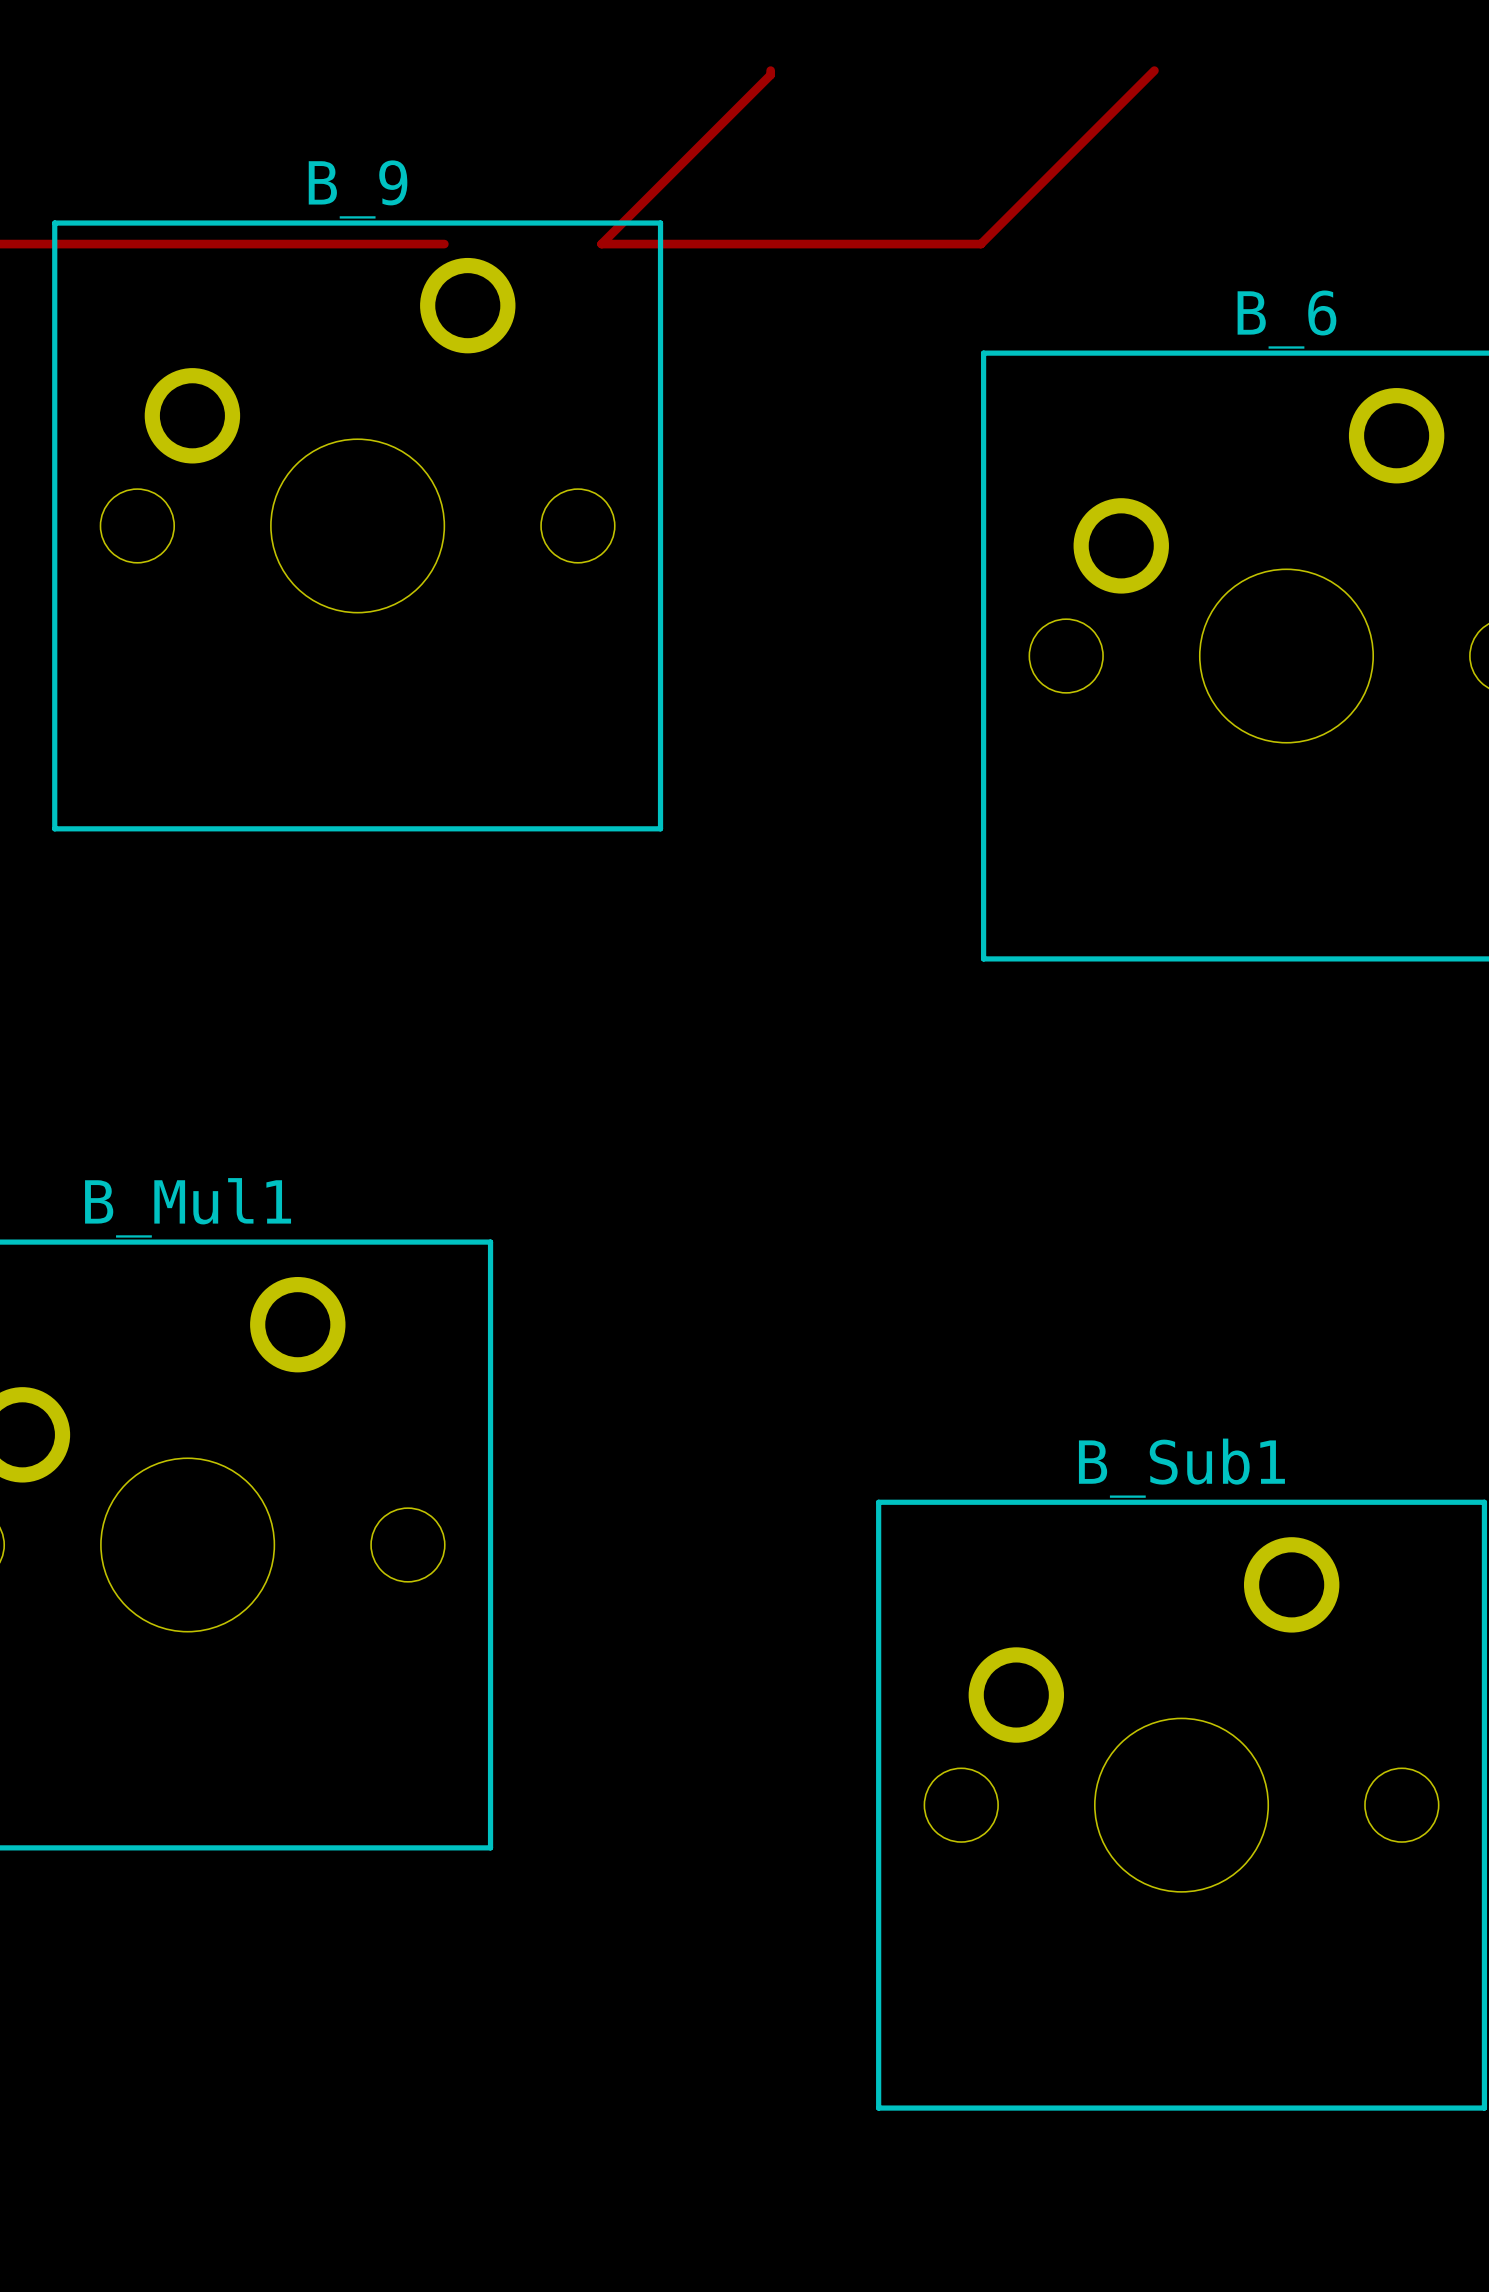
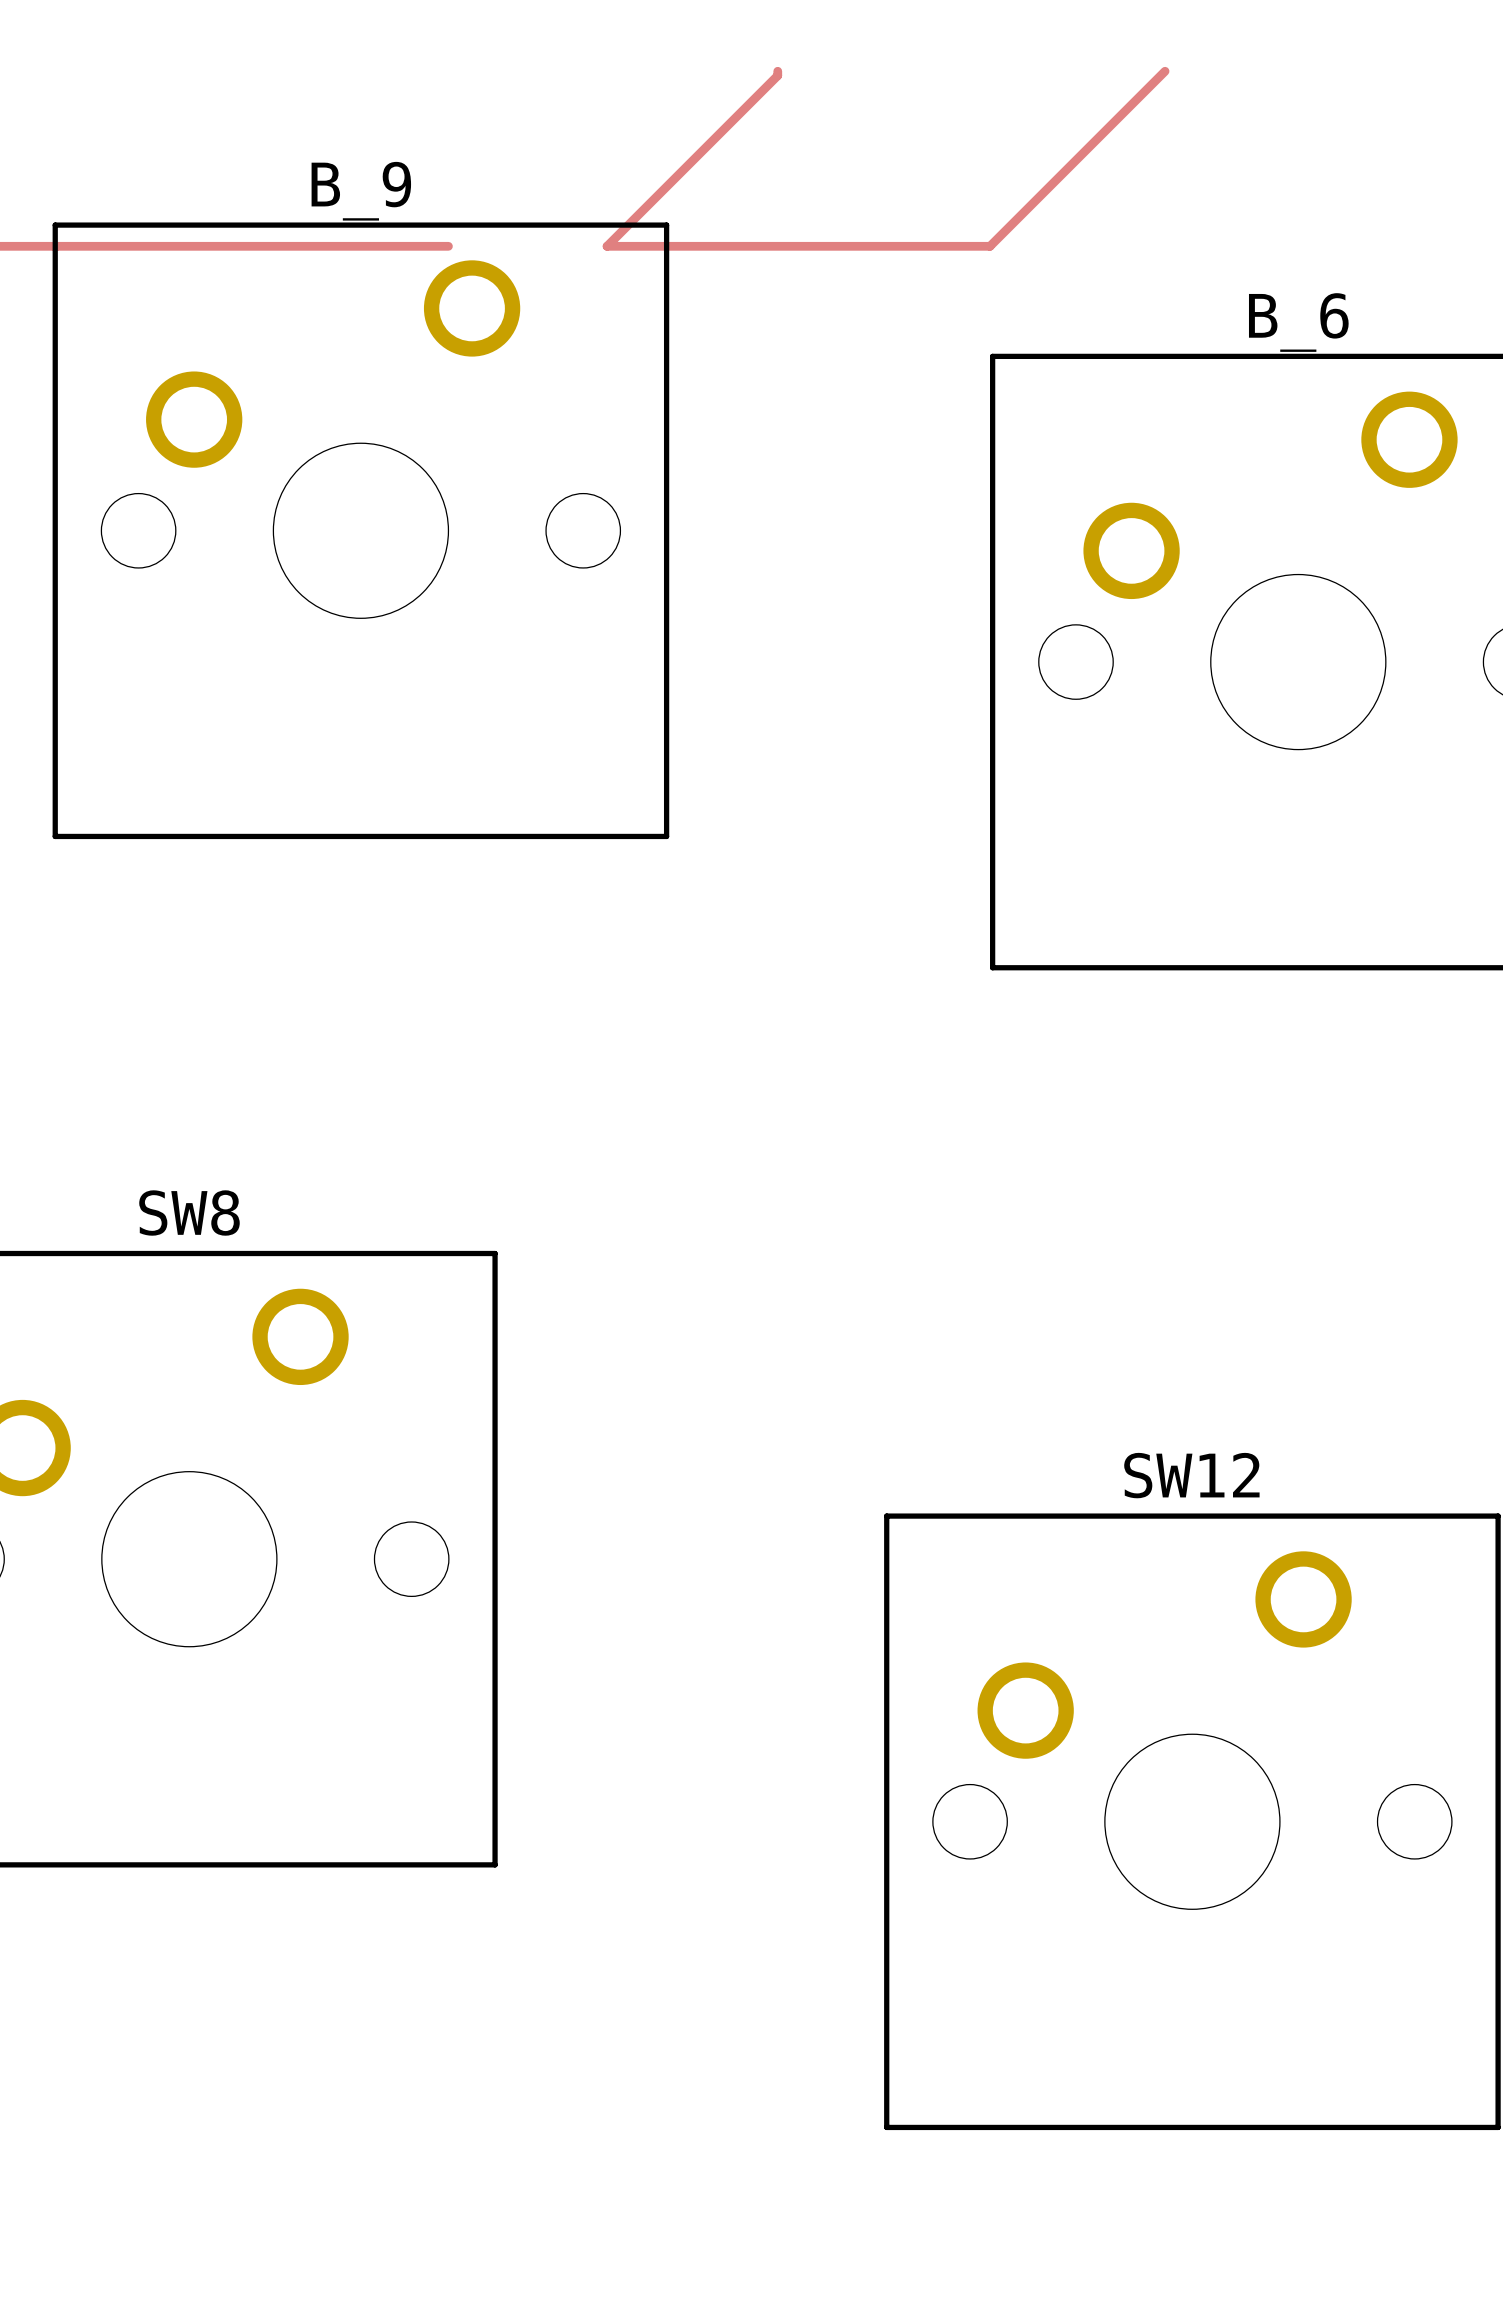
B_Mul1 name: B_Mul1 (188, 1207) -> SW8 (189, 1213)
B_Sub1 name: B_Sub1 (1181, 1468) -> SW12 (1191, 1475)

